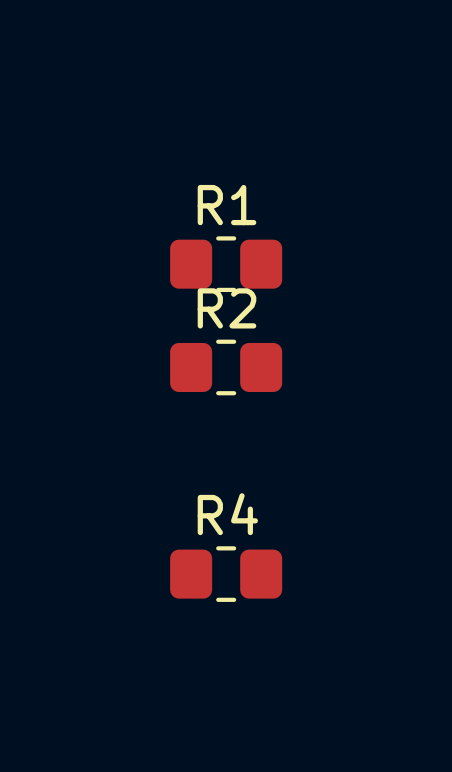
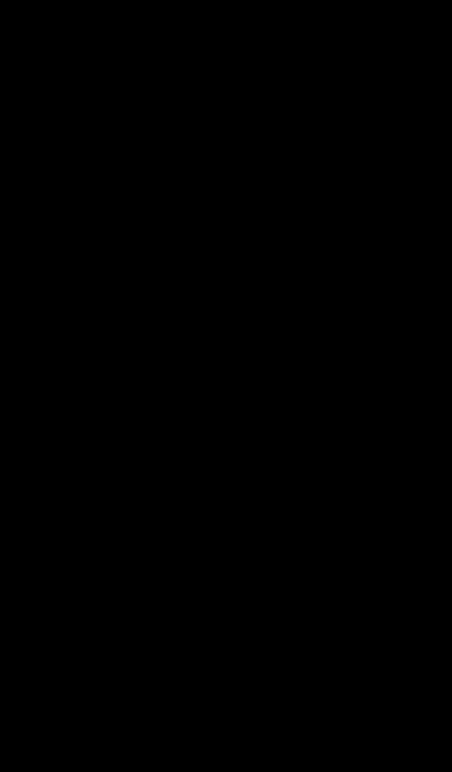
R1: (226, 264) -> none
R2: (226, 367) -> none
R4: (226, 574) -> none

